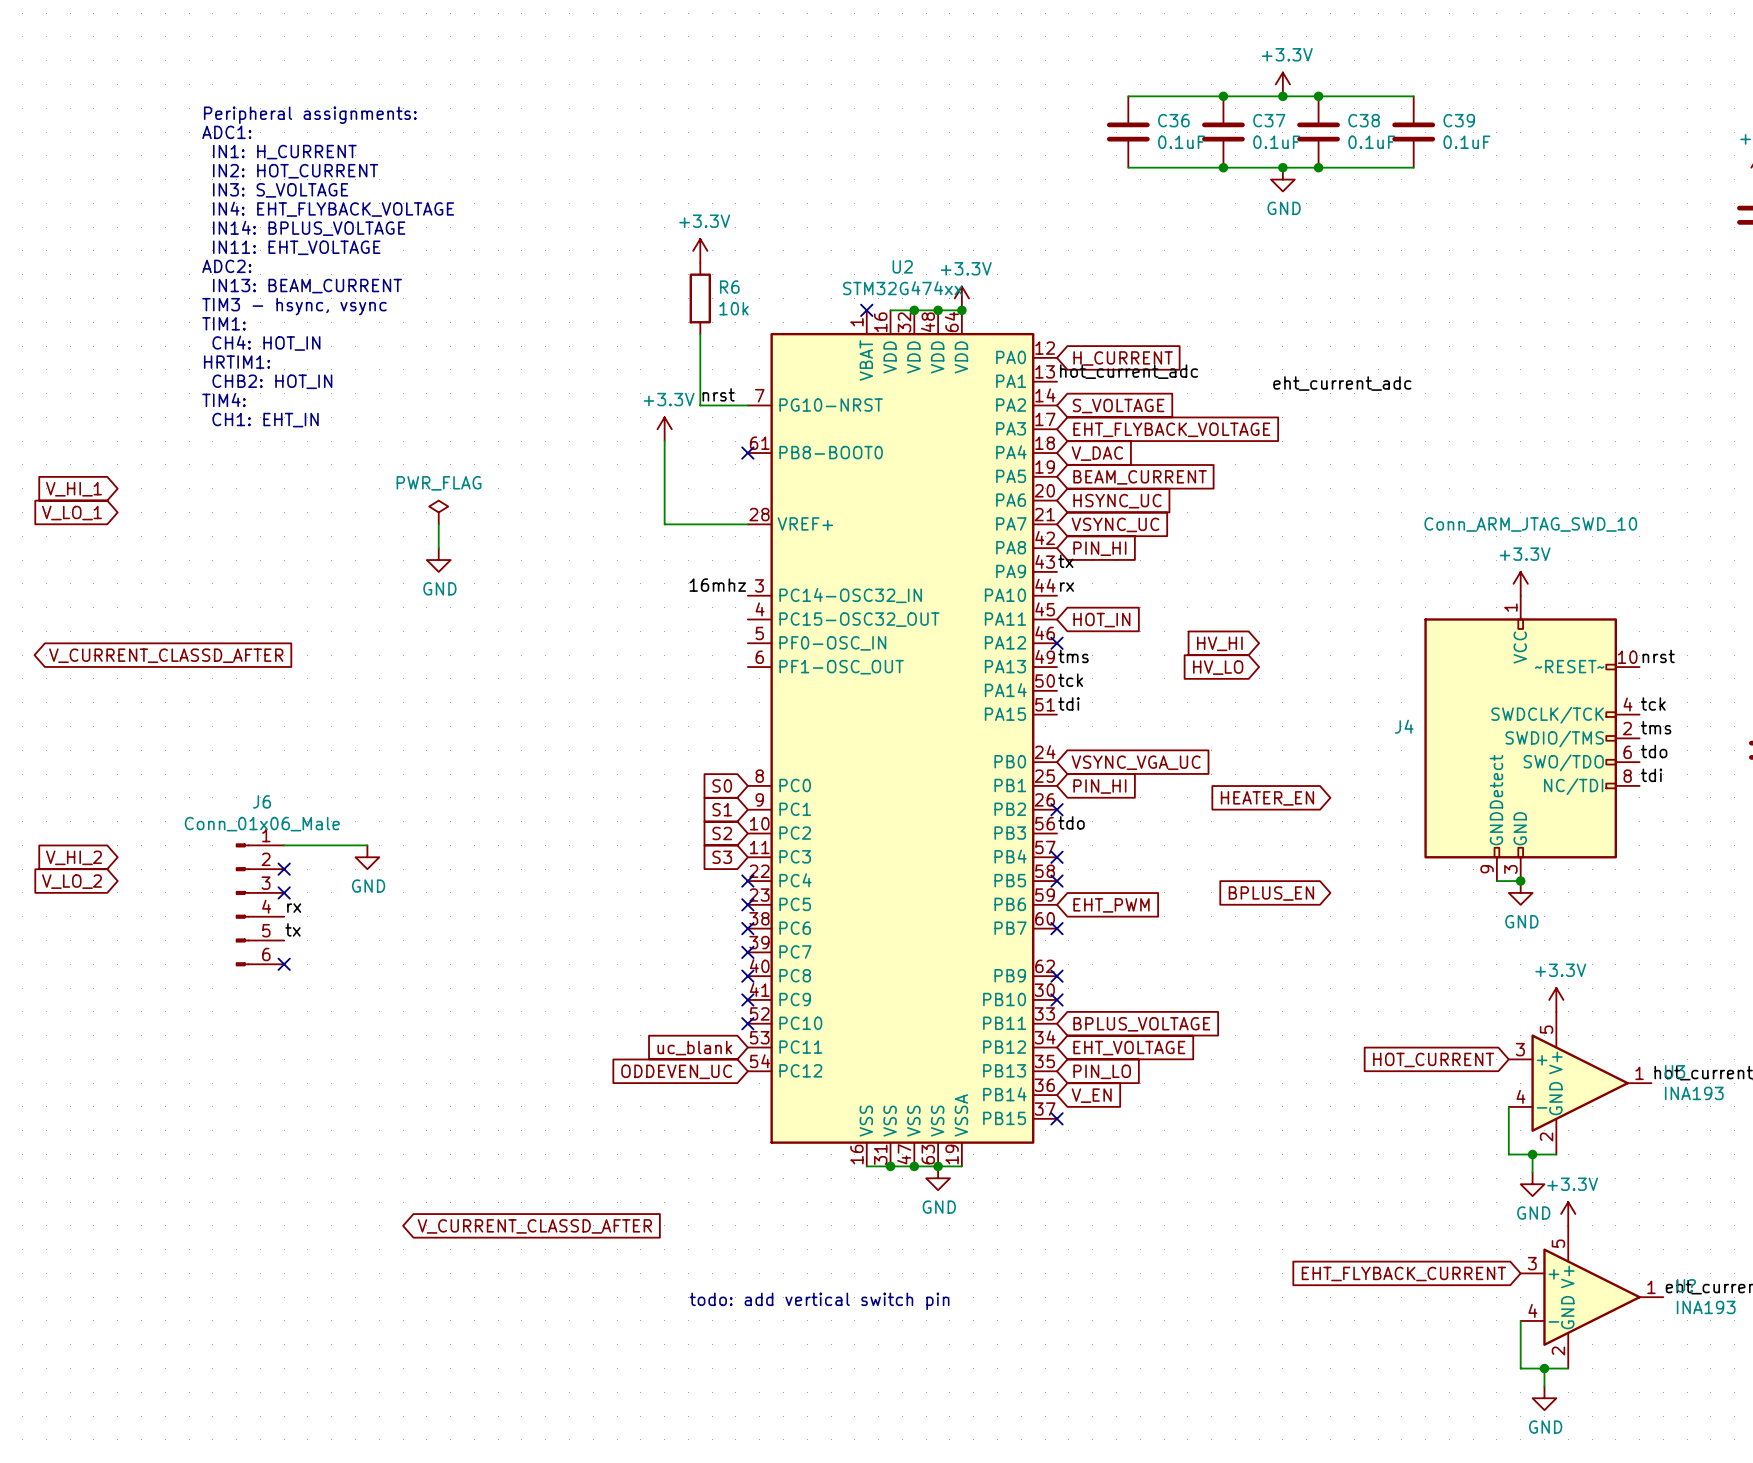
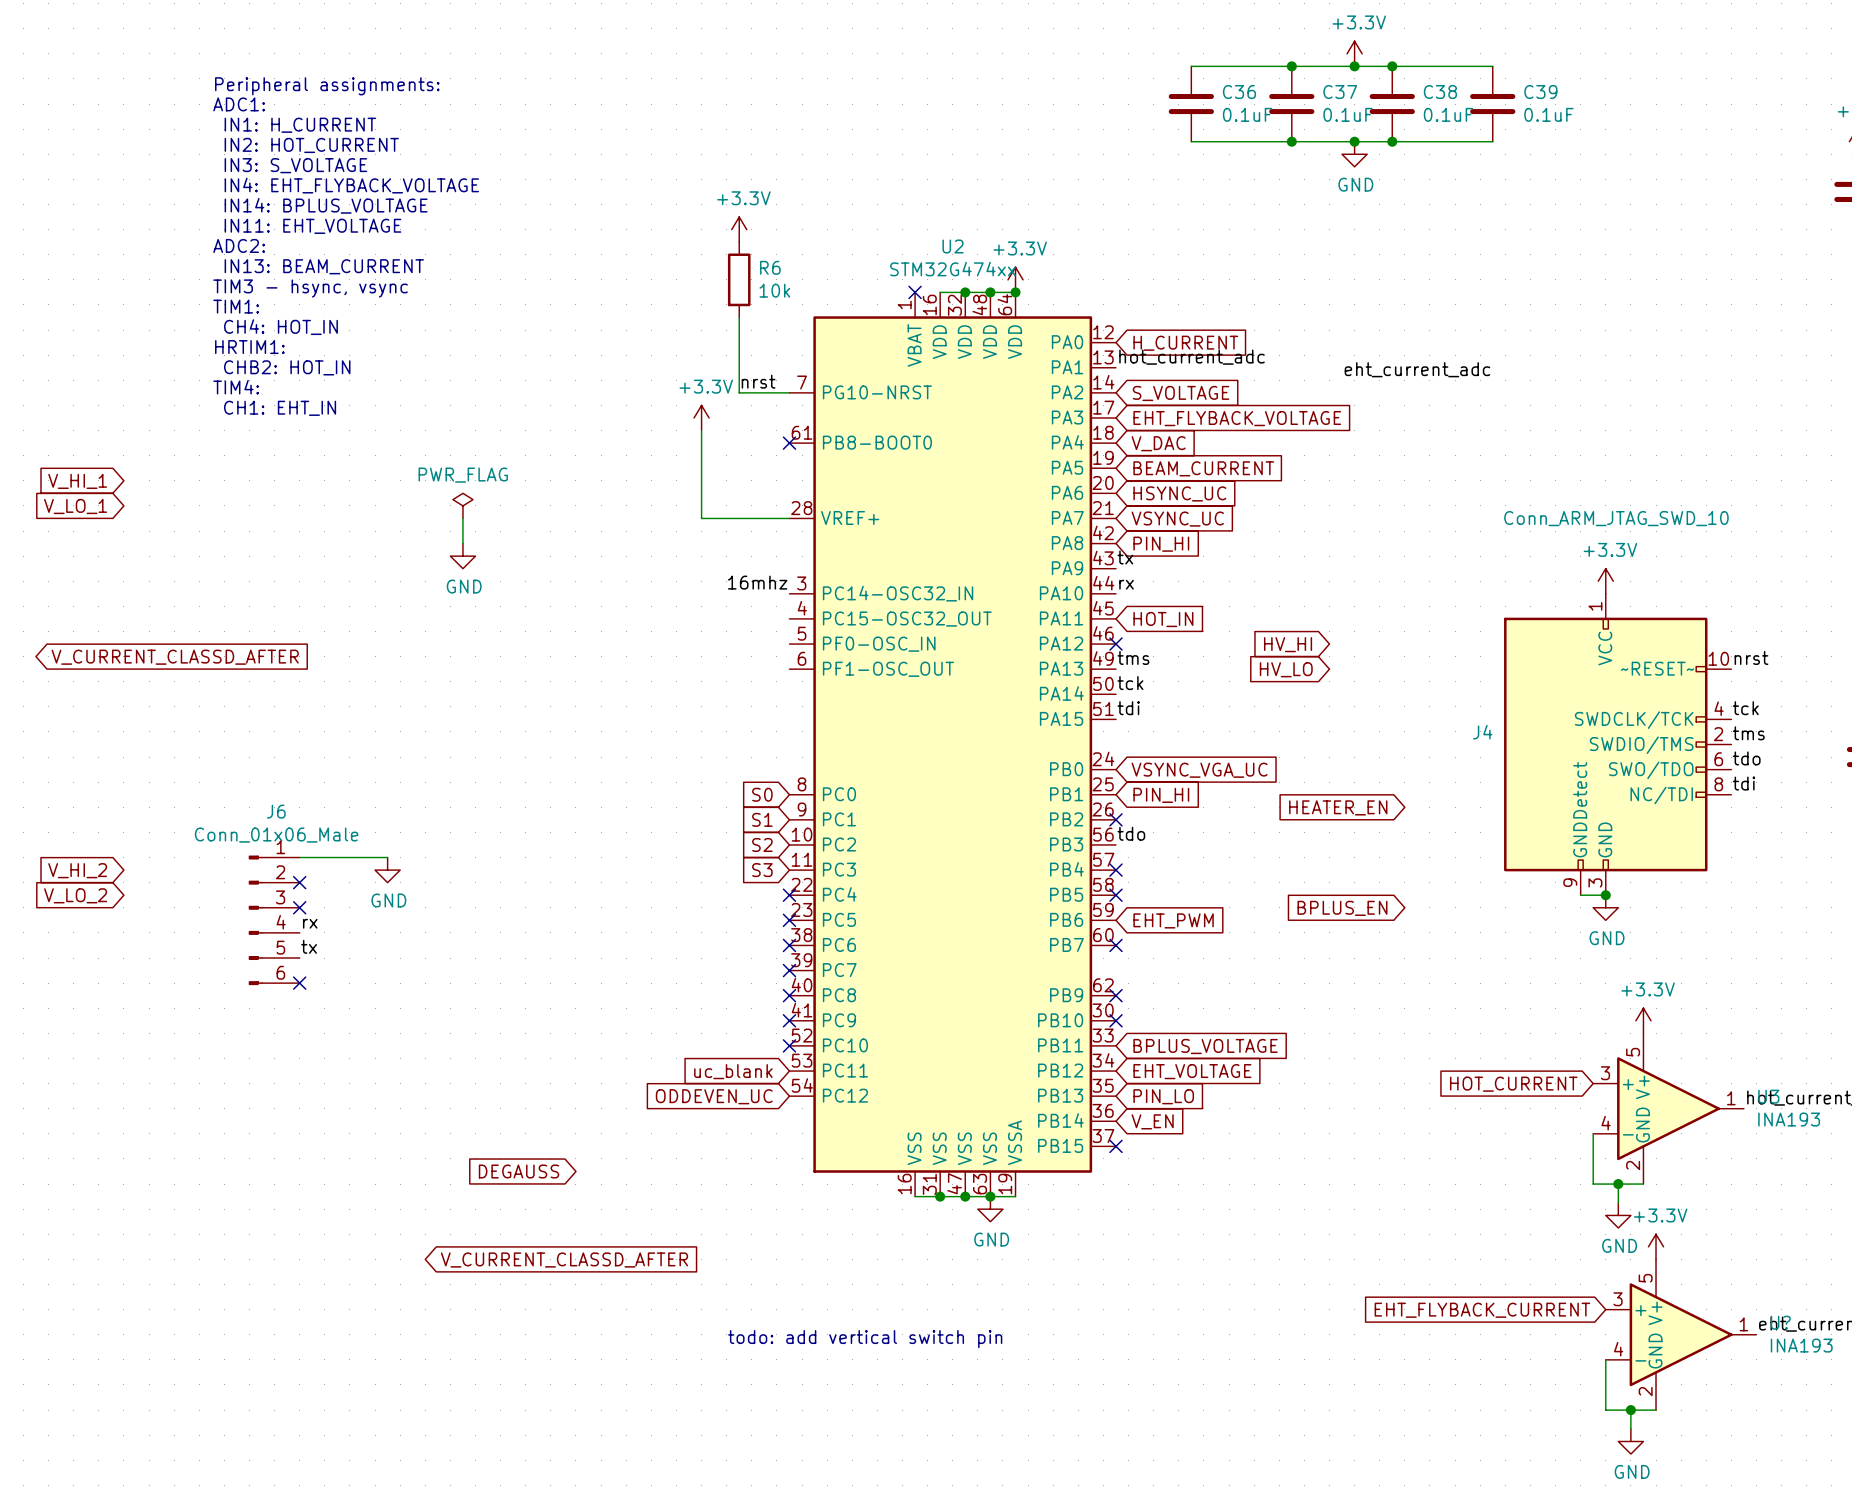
global label: none -> DEGAUSS (519, 1171)

